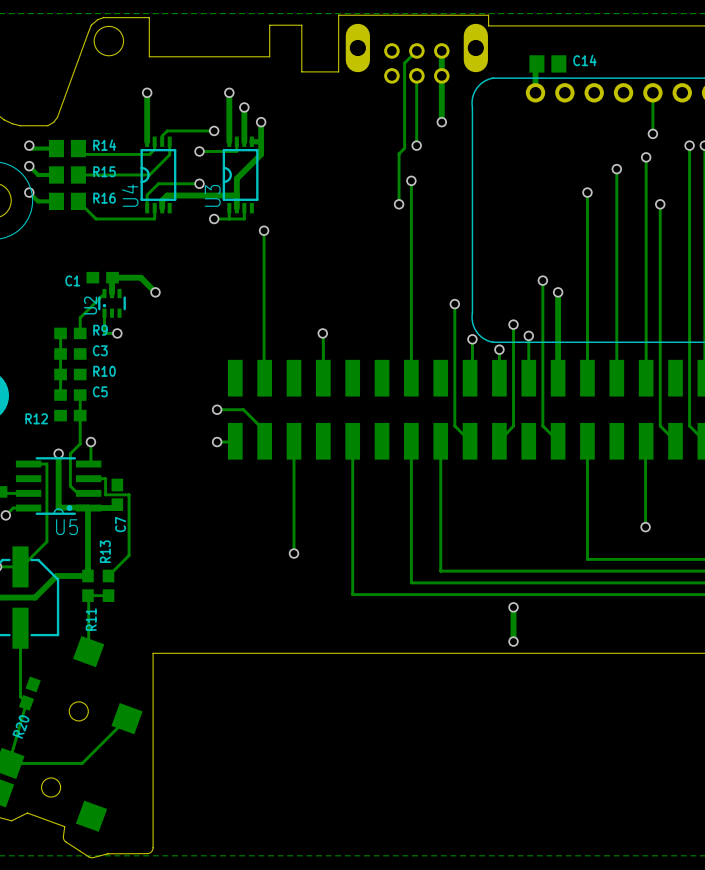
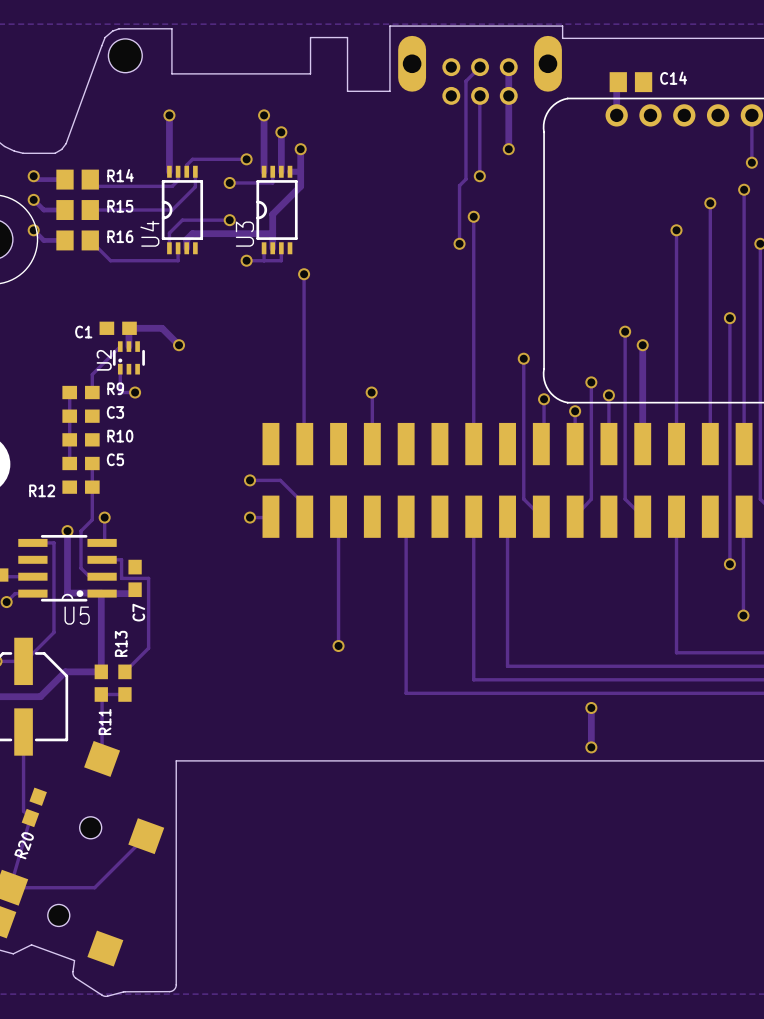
track: none -> (729, 318) (729, 564)
via: none -> (729, 318)
via: none -> (729, 564)

